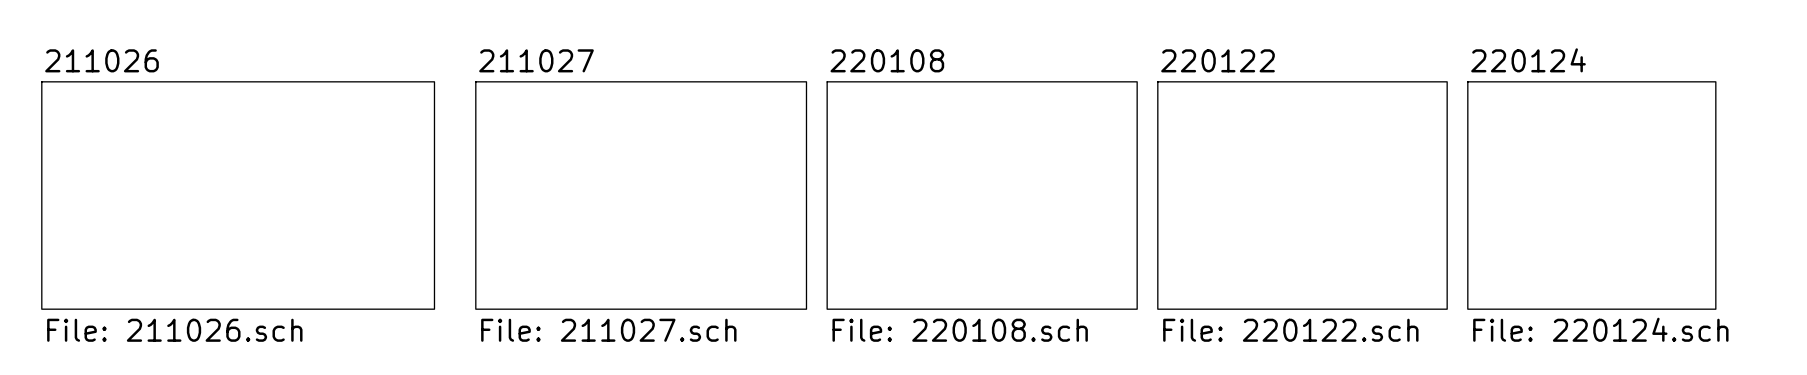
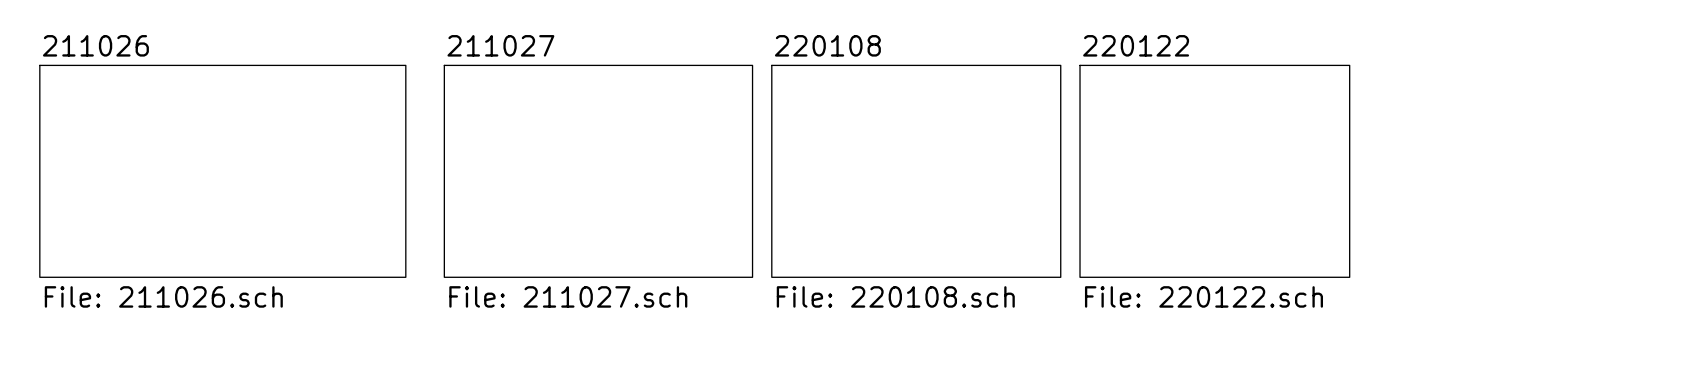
sheet 220124: File: 220124.sch (1591, 195) -> none

